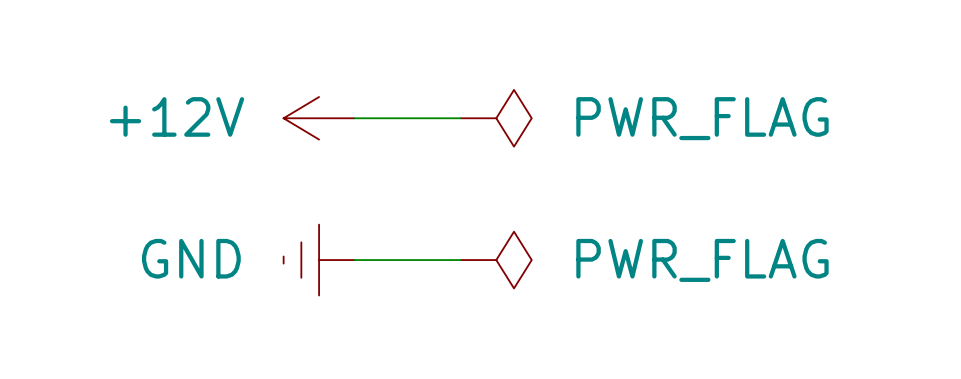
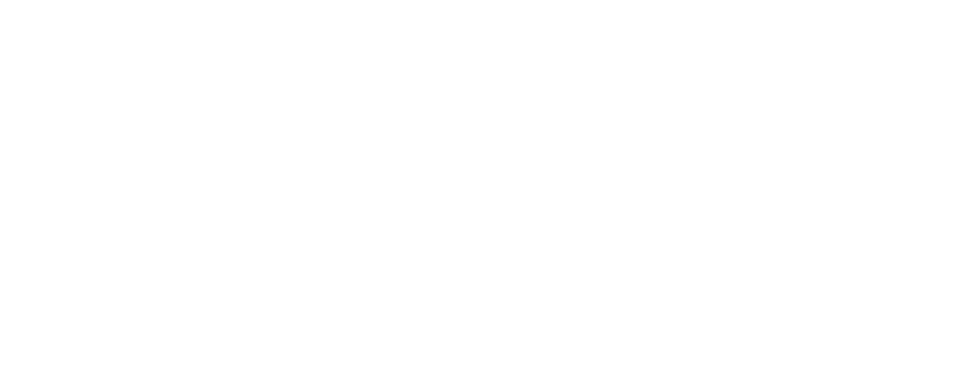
power symbol: +12V (319, 118) -> none
wire: (354, 118) (460, 118) -> none
power symbol: PWR_FLAG (496, 118) -> none
power symbol: GND (319, 260) -> none
wire: (354, 260) (460, 260) -> none
power symbol: PWR_FLAG (496, 260) -> none

